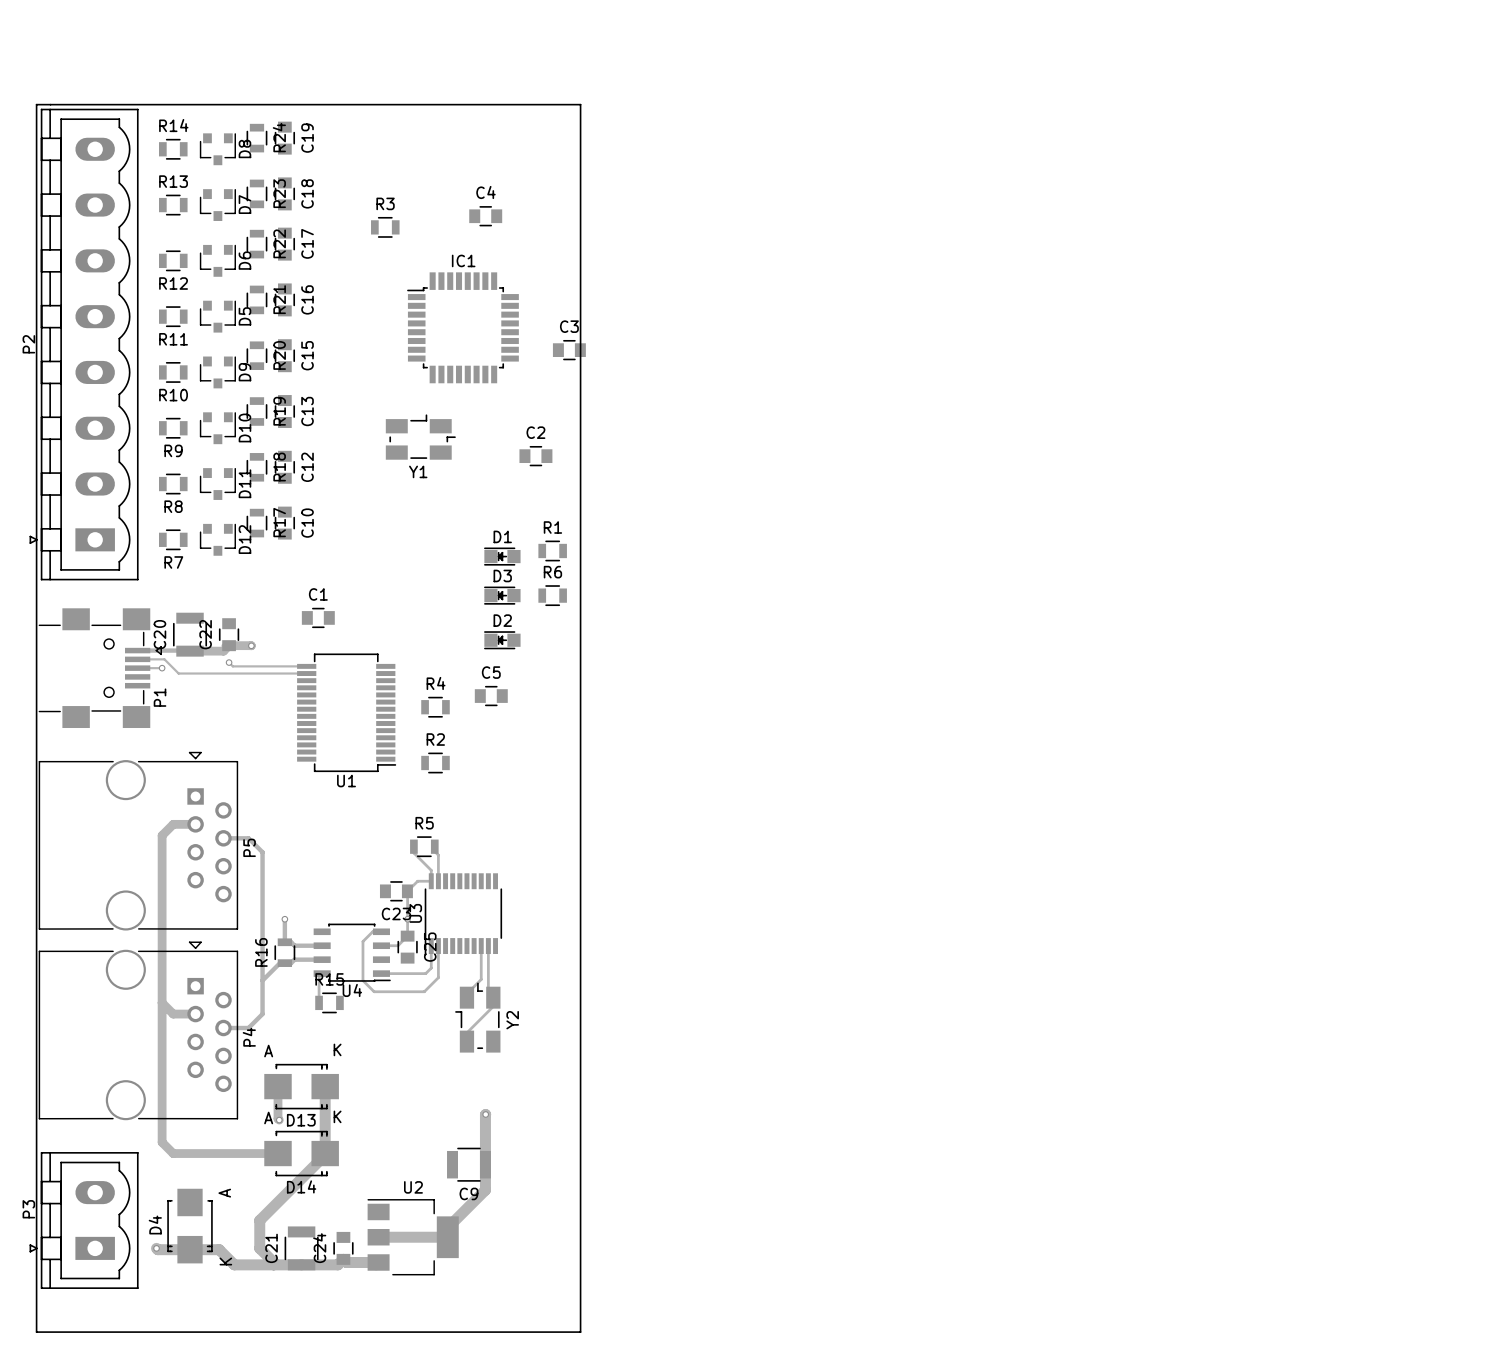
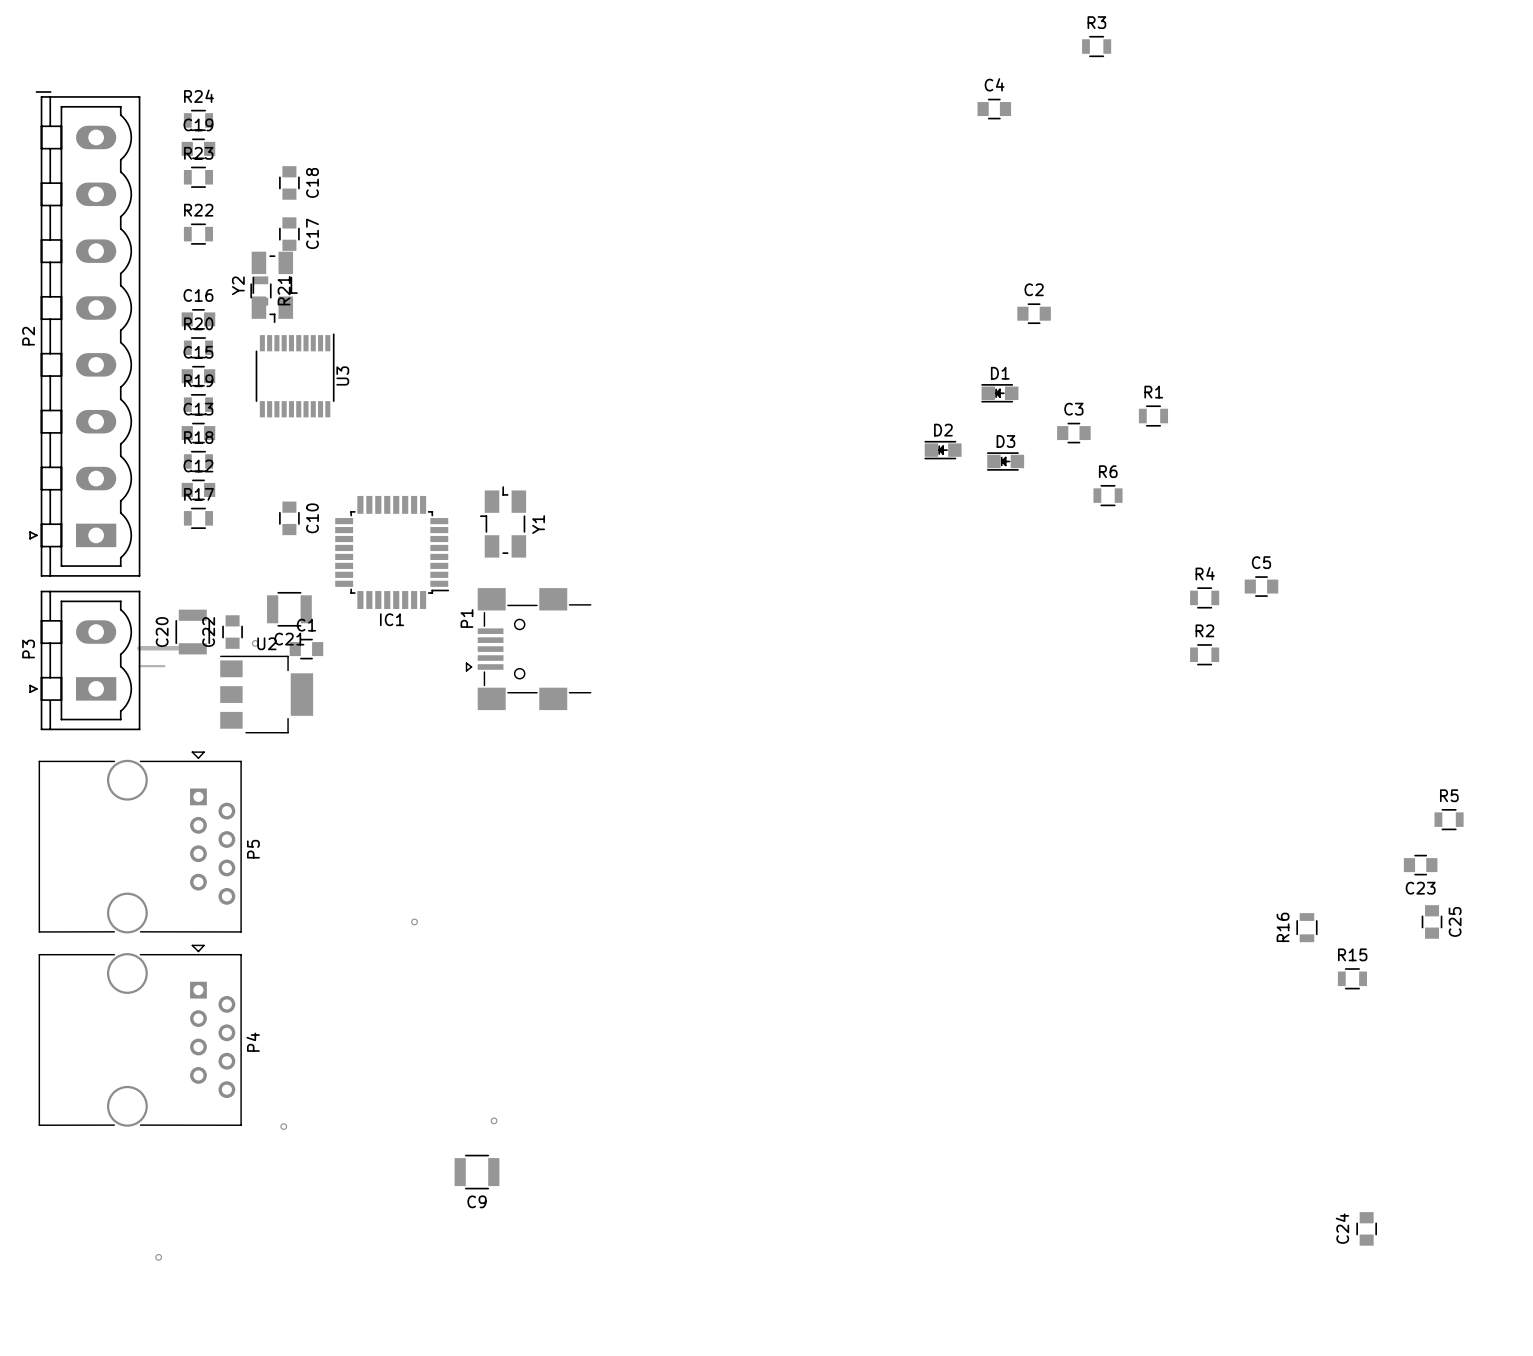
board edge: (36, 104) (36, 1332) (580, 1332) (580, 104) (50, 104) -> none
R24 name position: R24 (279, 137) -> R24 (198, 96)
R24 rotation: 0° (256, 138) -> 90° clockwise (198, 120)
R24 position: (256, 138) -> (198, 120)
C19 rotation: 0° (284, 138) -> 90° clockwise (198, 148)
C19 position: (284, 138) -> (198, 148)
C19 name position: C19 (307, 138) -> C19 (198, 124)
R14: (173, 149) -> none
D8: (217, 149) -> none
R23 rotation: 0° (256, 193) -> 90° clockwise (198, 177)
R23 position: (256, 193) -> (198, 177)
R23 name position: R23 (279, 193) -> R23 (198, 153)
R13: (173, 205) -> none
D7: (217, 205) -> none
C4 position: (485, 216) -> (994, 109)
R3 position: (385, 227) -> (1096, 46)
R22 name position: R22 (279, 243) -> R22 (198, 210)
R22 rotation: 0° (256, 244) -> 90° clockwise (198, 234)
R22 position: (256, 244) -> (198, 234)
R12: (173, 260) -> none
D6: (217, 260) -> none
C16 rotation: 0° (284, 299) -> 90° clockwise (198, 319)
C16 position: (284, 299) -> (198, 319)
C16 name position: C16 (307, 299) -> C16 (198, 295)
R11: (173, 316) -> none
D5: (217, 316) -> none
IC1 rotation: 0° (462, 327) -> 180° (392, 552)
IC1 position: (462, 327) -> (392, 552)
C3 position: (569, 350) -> (1073, 433)
R20 rotation: 0° (256, 355) -> 90° clockwise (198, 347)
R20 position: (256, 355) -> (198, 347)
R20 name position: R20 (279, 355) -> R20 (198, 323)
C15 rotation: 0° (284, 355) -> 90° clockwise (198, 376)
C15 position: (284, 355) -> (198, 376)
C15 name position: C15 (307, 355) -> C15 (198, 352)
R10: (173, 372) -> none
D9: (217, 372) -> none
R19 rotation: 0° (256, 411) -> 90° clockwise (198, 404)
R19 position: (256, 411) -> (198, 404)
R19 name position: R19 (279, 411) -> R19 (198, 380)
C13 rotation: 0° (284, 411) -> 90° clockwise (198, 433)
C13 position: (284, 411) -> (198, 433)
C13 name position: C13 (307, 411) -> C13 (198, 409)
R9: (173, 428) -> none
D10: (217, 428) -> none
Y1 rotation: 0° (420, 437) -> 90° counterclockwise (503, 521)
Y1 position: (420, 437) -> (503, 521)
C2 position: (535, 456) -> (1034, 313)
R18 rotation: 0° (256, 467) -> 90° clockwise (198, 461)
R18 position: (256, 467) -> (198, 461)
R18 name position: R18 (279, 467) -> R18 (198, 437)
C12 rotation: 0° (284, 467) -> 90° clockwise (198, 489)
C12 position: (284, 467) -> (198, 489)
C12 name position: C12 (307, 467) -> C12 (198, 466)
D11: (217, 483) -> none
R8: (173, 484) -> none
R17 name position: R17 (279, 522) -> R17 (198, 494)
R17 rotation: 0° (256, 523) -> 90° clockwise (198, 518)
R17 position: (256, 523) -> (198, 518)
R7: (173, 539) -> none
D12: (217, 539) -> none
R1 position: (552, 550) -> (1153, 416)
D1 position: (502, 556) -> (999, 393)
D3 position: (502, 595) -> (1005, 461)
R6 position: (552, 595) -> (1108, 495)
C1 position: (318, 617) -> (306, 649)
D2 position: (502, 640) -> (942, 450)
track: (229, 645) (251, 645) -> none
track: (229, 645) (223, 651) (190, 651) -> none
track: (137, 659) (164, 659) (178, 673) (306, 673) -> none
track: (229, 662) (232, 666) (306, 666) -> none
via: (229, 662) -> none
P1 rotation: 0° (100, 668) -> 180° (528, 649)
P1 position: (100, 668) -> (528, 649)
via: (162, 668) -> none
C5 position: (491, 696) -> (1261, 586)
R4 position: (435, 707) -> (1204, 597)
U1: (346, 712) -> none
R2 position: (435, 762) -> (1204, 654)
track: (195, 824) (173, 824) (162, 835) (162, 1142) (173, 1153) (278, 1153) -> none
track: (223, 838) (248, 838) (262, 852) (262, 1014) (248, 1028) (223, 1028) -> none
track: (413, 846) (413, 852) (431, 870) (431, 881) (417, 881) (407, 891) -> none
R5 position: (424, 846) -> (1449, 819)
track: (434, 846) (434, 851) (438, 855) (438, 881) -> none
C23 position: (396, 891) -> (1420, 865)
track: (407, 891) (407, 936) (398, 945) (381, 945) -> none
U3 rotation: 0° (463, 914) -> 180° (295, 375)
U3 position: (463, 914) -> (295, 375)
track: (284, 919) (284, 942) (291, 942) (294, 945) (322, 945) -> none
via: (284, 919) -> none
track: (381, 931) (372, 931) (362, 941) (362, 980) (374, 991) (424, 991) (438, 977) (438, 946) -> none
track: (431, 946) (431, 968) (425, 973) (381, 973) -> none
track: (481, 946) (481, 979) (466, 993) (466, 997) -> none
track: (488, 946) (488, 992) (493, 997) -> none
C25 position: (407, 947) -> (1432, 921)
R16 position: (284, 952) -> (1306, 927)
U4: (352, 952) -> none
track: (322, 959) (294, 959) (290, 963) (280, 963) (262, 980) -> none
track: (322, 973) (319, 976) (319, 1002) -> none
track: (493, 997) (493, 1006) (466, 1032) (466, 1041) -> none
track: (162, 1002) (173, 1014) (195, 1014) -> none
R15 position: (329, 1002) -> (1352, 978)
Y2 rotation: 0° (477, 1017) -> 180° (274, 287)
Y2 position: (477, 1017) -> (274, 287)
track: (278, 1086) (279, 1120) -> none
D13: (301, 1086) -> none
track: (325, 1086) (325, 1155) (259, 1220) (259, 1248) (273, 1262) (273, 1264) -> none
track: (485, 1114) (485, 1190) (447, 1227) (447, 1237) (378, 1237) -> none
D14: (301, 1153) -> none
P3 position: (84, 1220) -> (84, 660)
D4: (190, 1226) -> none
U2 position: (413, 1237) -> (266, 694)
track: (156, 1248) (219, 1249) (234, 1264) (337, 1264) (343, 1259) (346, 1262) (378, 1262) (376, 1264) -> none
C21 name position: C21 (271, 1248) -> C21 (289, 639)
C21 rotation: 0° (301, 1248) -> 90° clockwise (289, 609)
C21 position: (301, 1248) -> (289, 609)
C24 position: (343, 1248) -> (1366, 1228)

